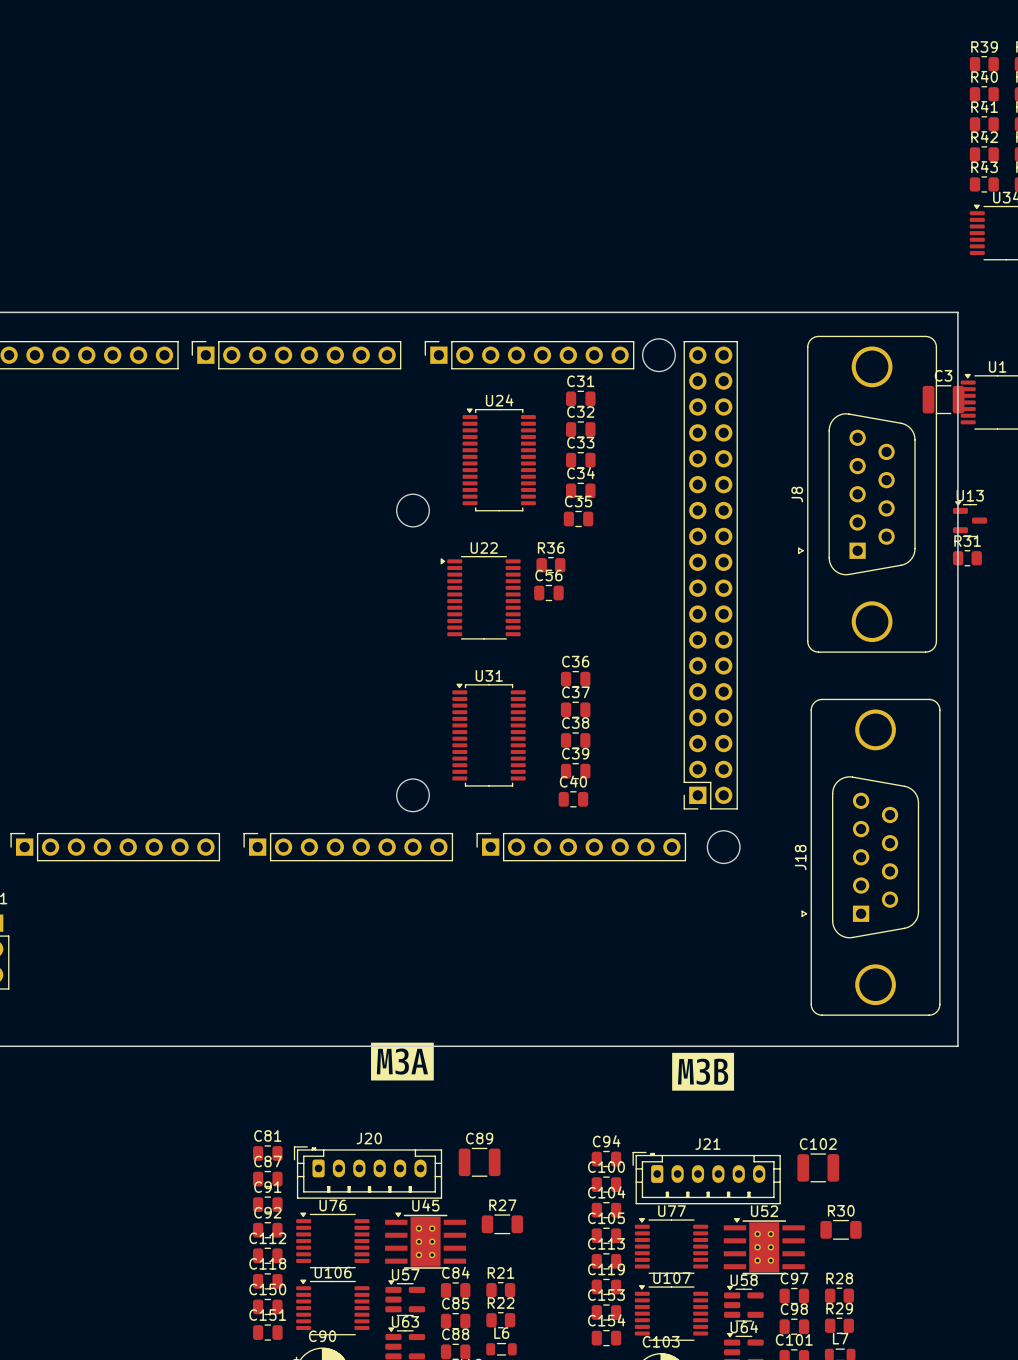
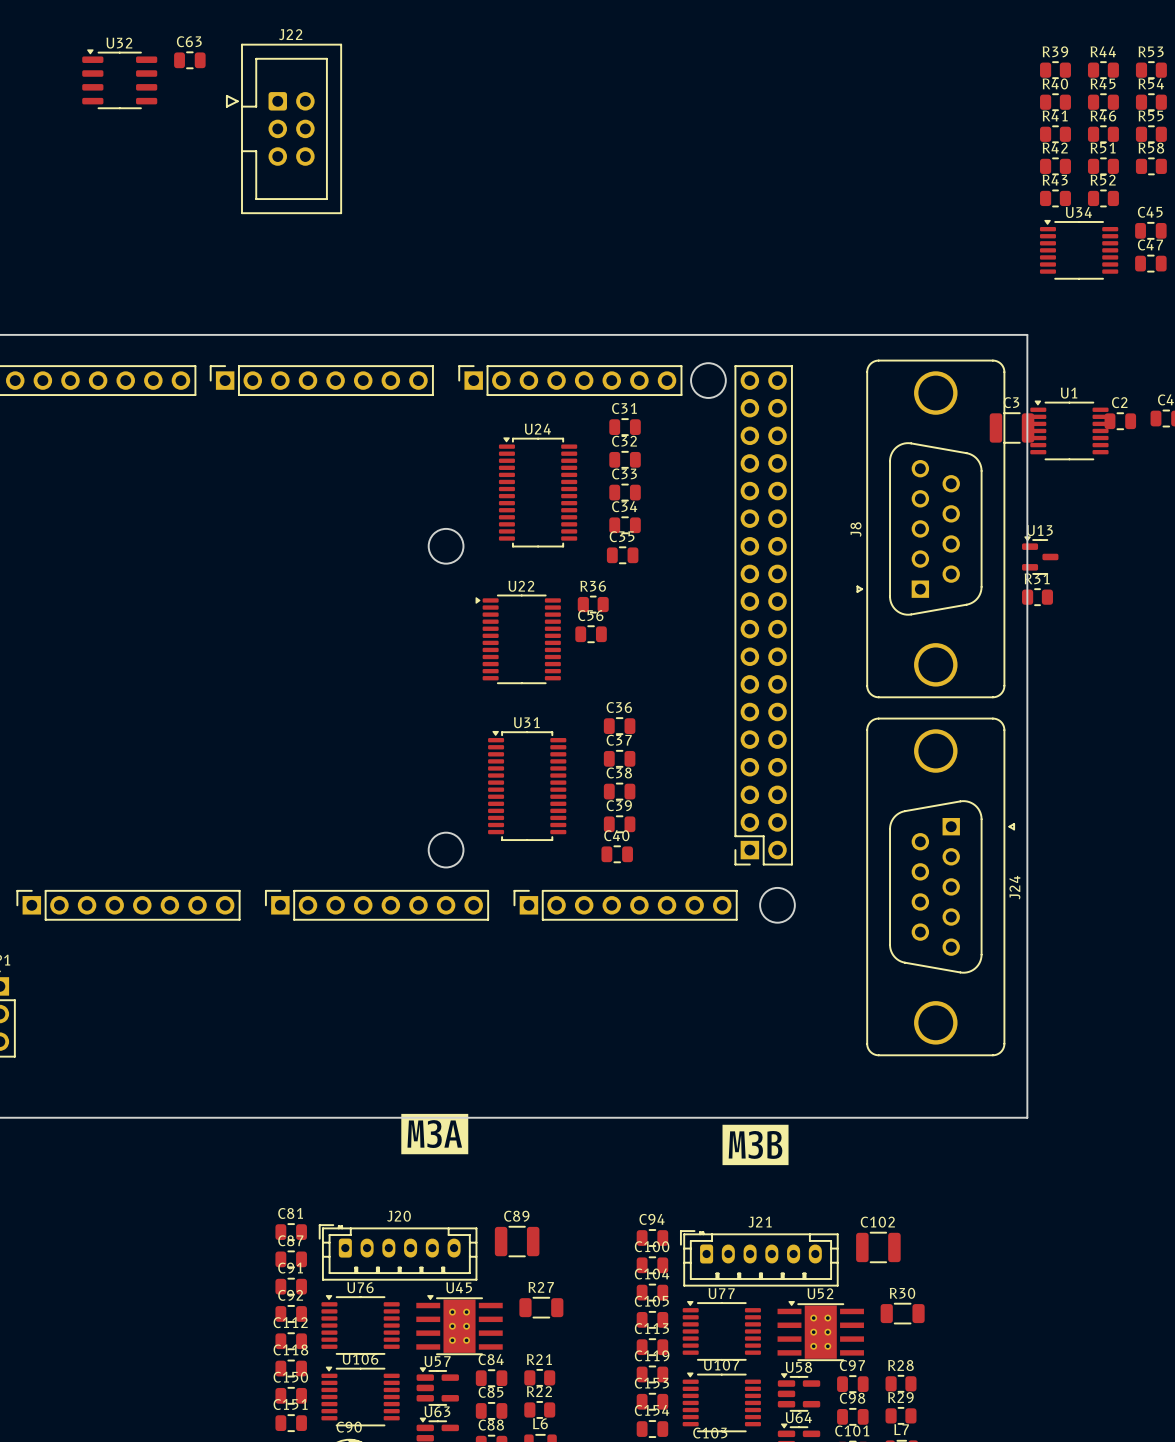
C63: none -> (189, 60)
U32: none -> (119, 79)
J22: none -> (284, 128)
J24: none -> (940, 886)
J18: (871, 857) -> none

